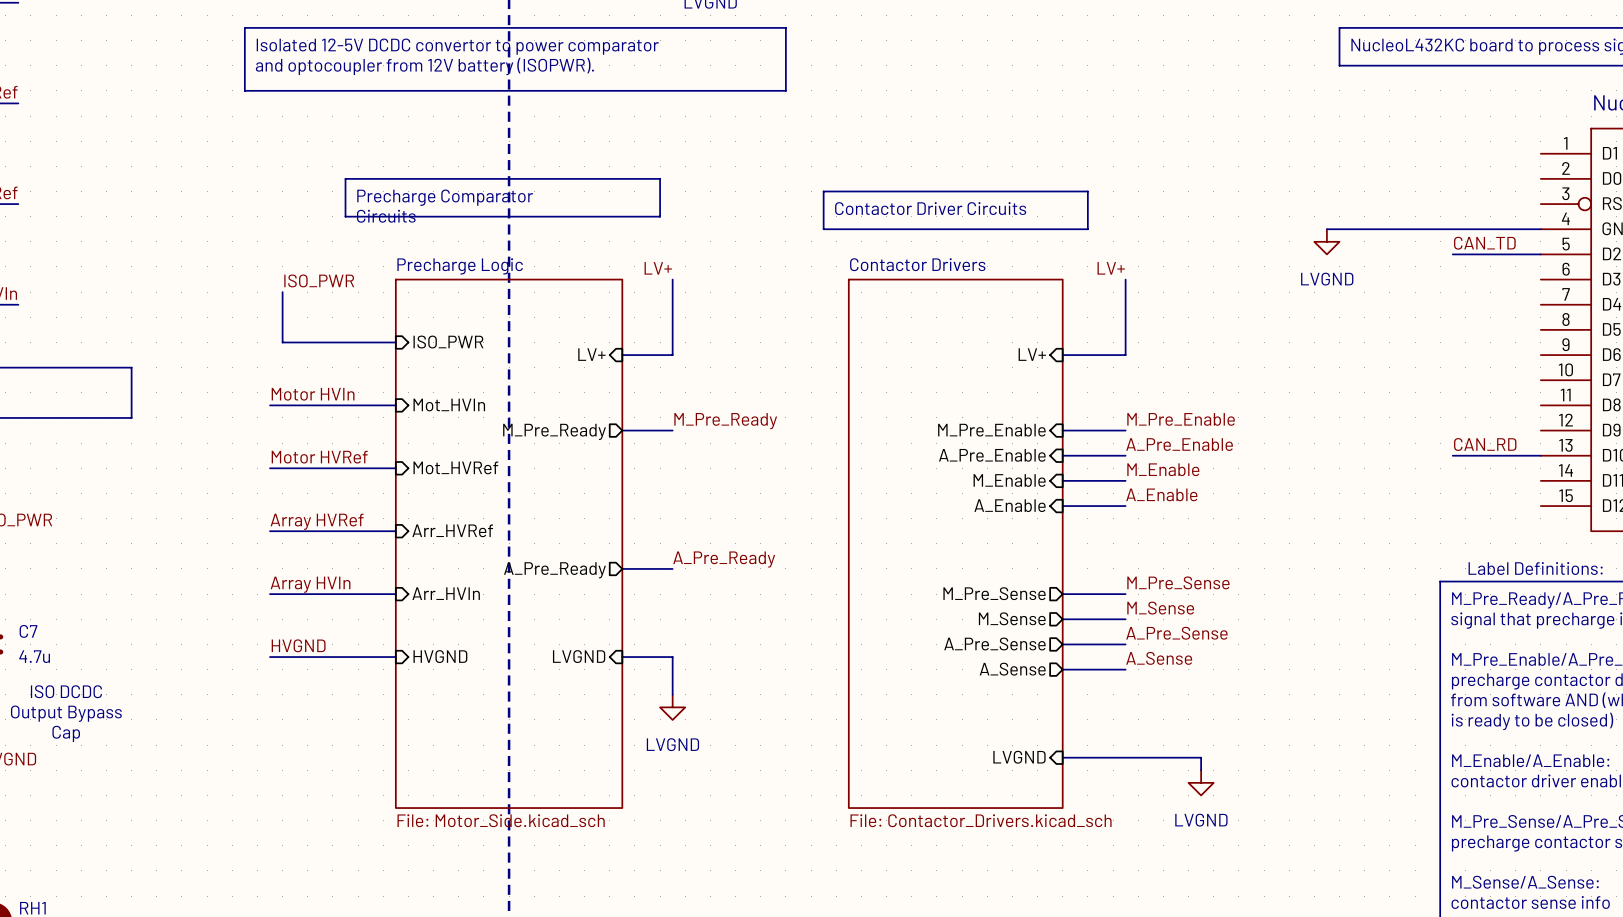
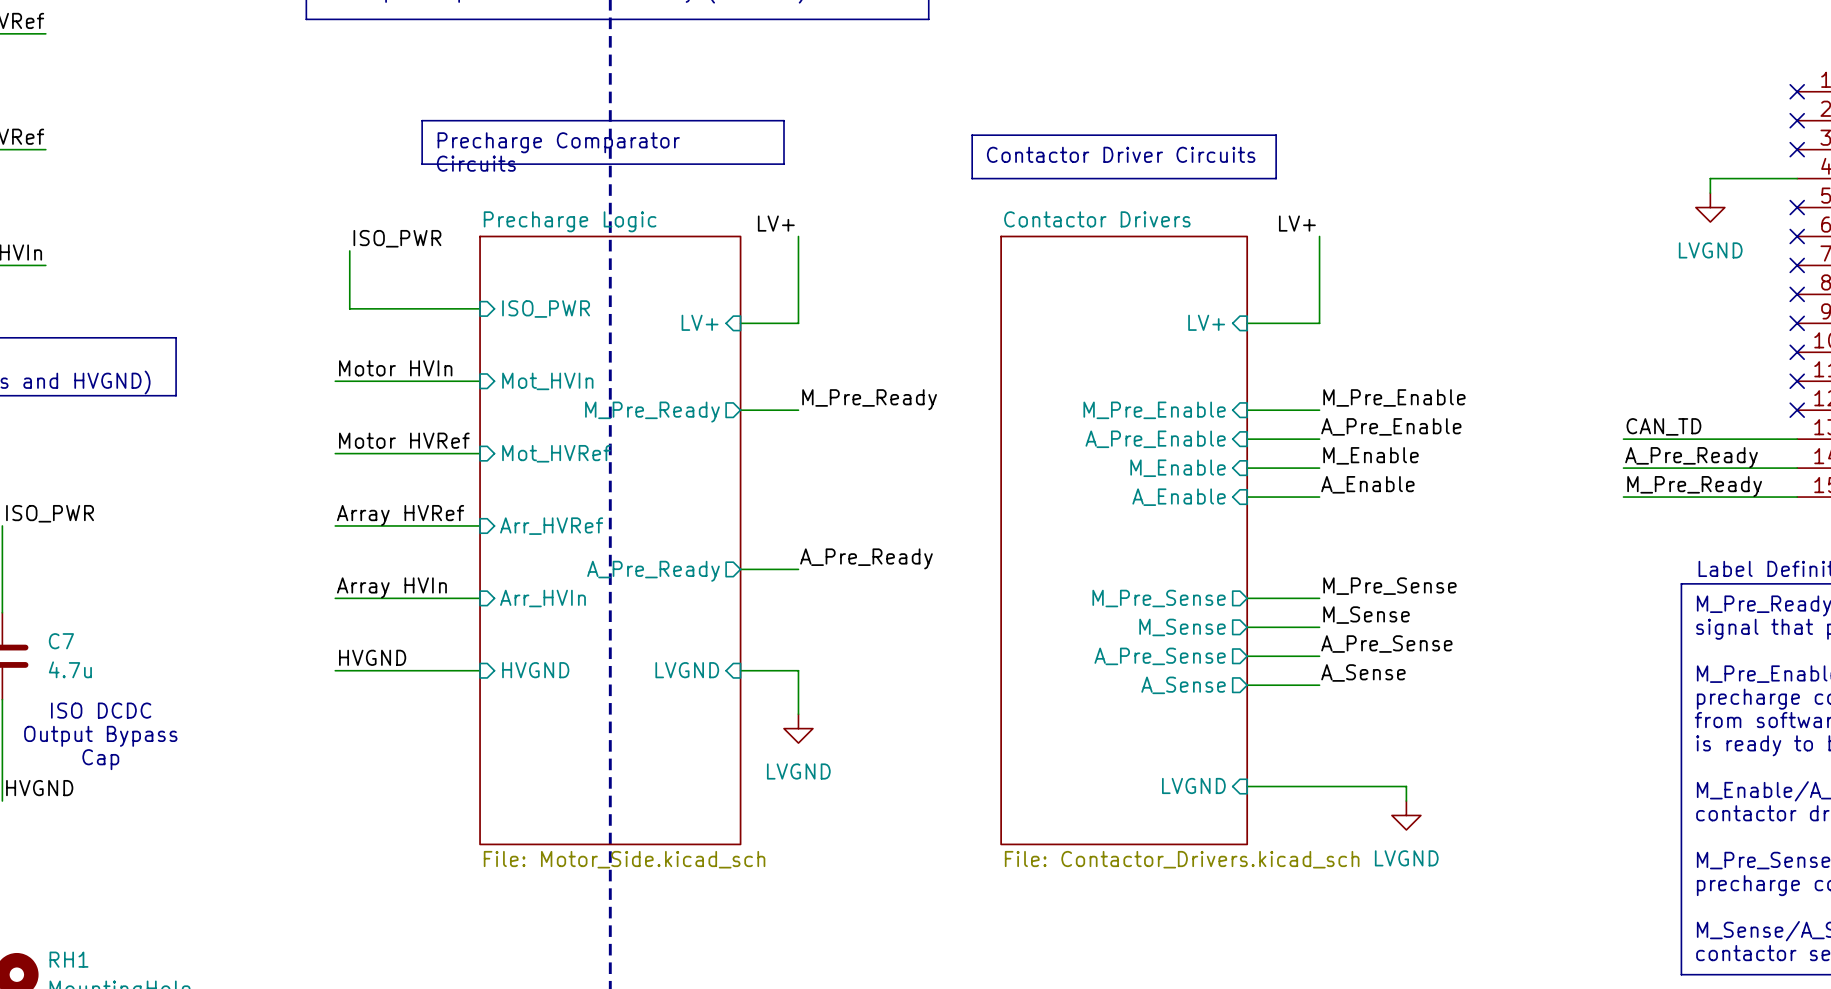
no-connect mark: none -> (1797, 91)
no-connect mark: none -> (1797, 120)
no-connect mark: none -> (1797, 149)
wire: (1326, 229) (1465, 229) -> (1710, 193) (1710, 178)
power symbol position: LVGND (1326, 241) -> LVGND (1710, 207)
label position: CAN_TD (1484, 243) -> CAN_TD (1663, 426)
wire: (1452, 254) (1540, 254) -> none
no-connect mark: none -> (1797, 207)
no-connect mark: none -> (1797, 236)
no-connect mark: none -> (1797, 265)
no-connect mark: none -> (1797, 294)
no-connect mark: none -> (1797, 323)
no-connect mark: none -> (1797, 352)
no-connect mark: none -> (1797, 381)
no-connect mark: none -> (1797, 410)
label: CAN_RD (1485, 444) -> none
wire: none -> (1623, 439) (1695, 439)
label: none -> A_Pre_Ready (1691, 457)
wire: none -> (1623, 468) (1797, 468)
label: none -> M_Pre_Ready (1694, 486)
wire: none -> (1623, 497) (1797, 497)

